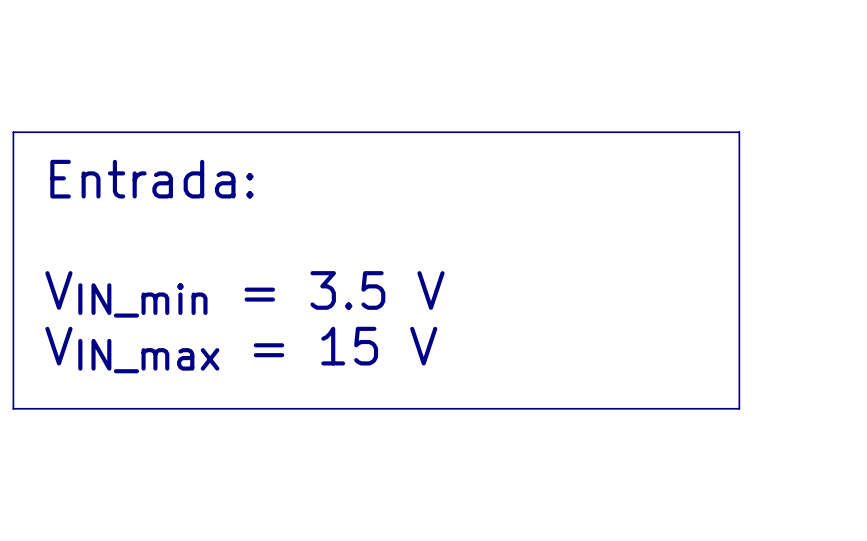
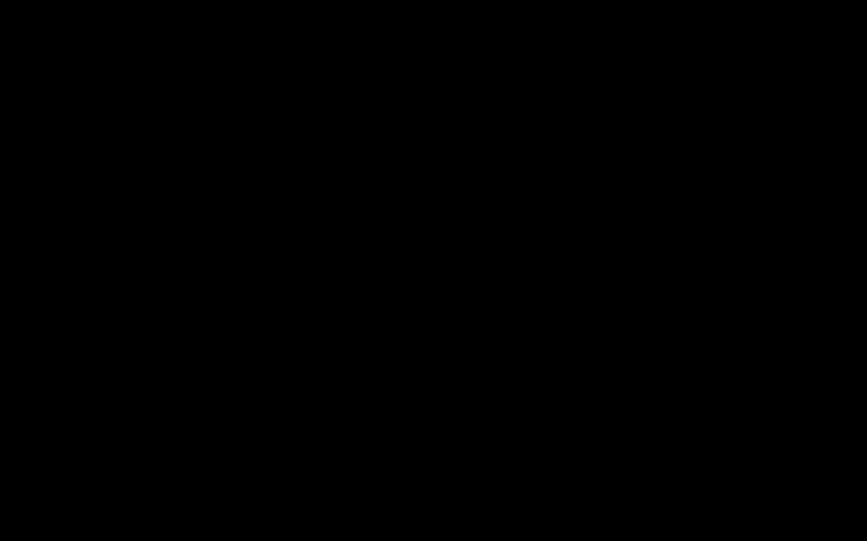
line: (13, 132) (739, 132) (739, 408) (13, 408) (13, 132) -> none
text: Entrada: (151, 179) -> none
text: VIN_min = 3.5 V (244, 294) -> none
text: VIN_max = 15 V (241, 350) -> none

